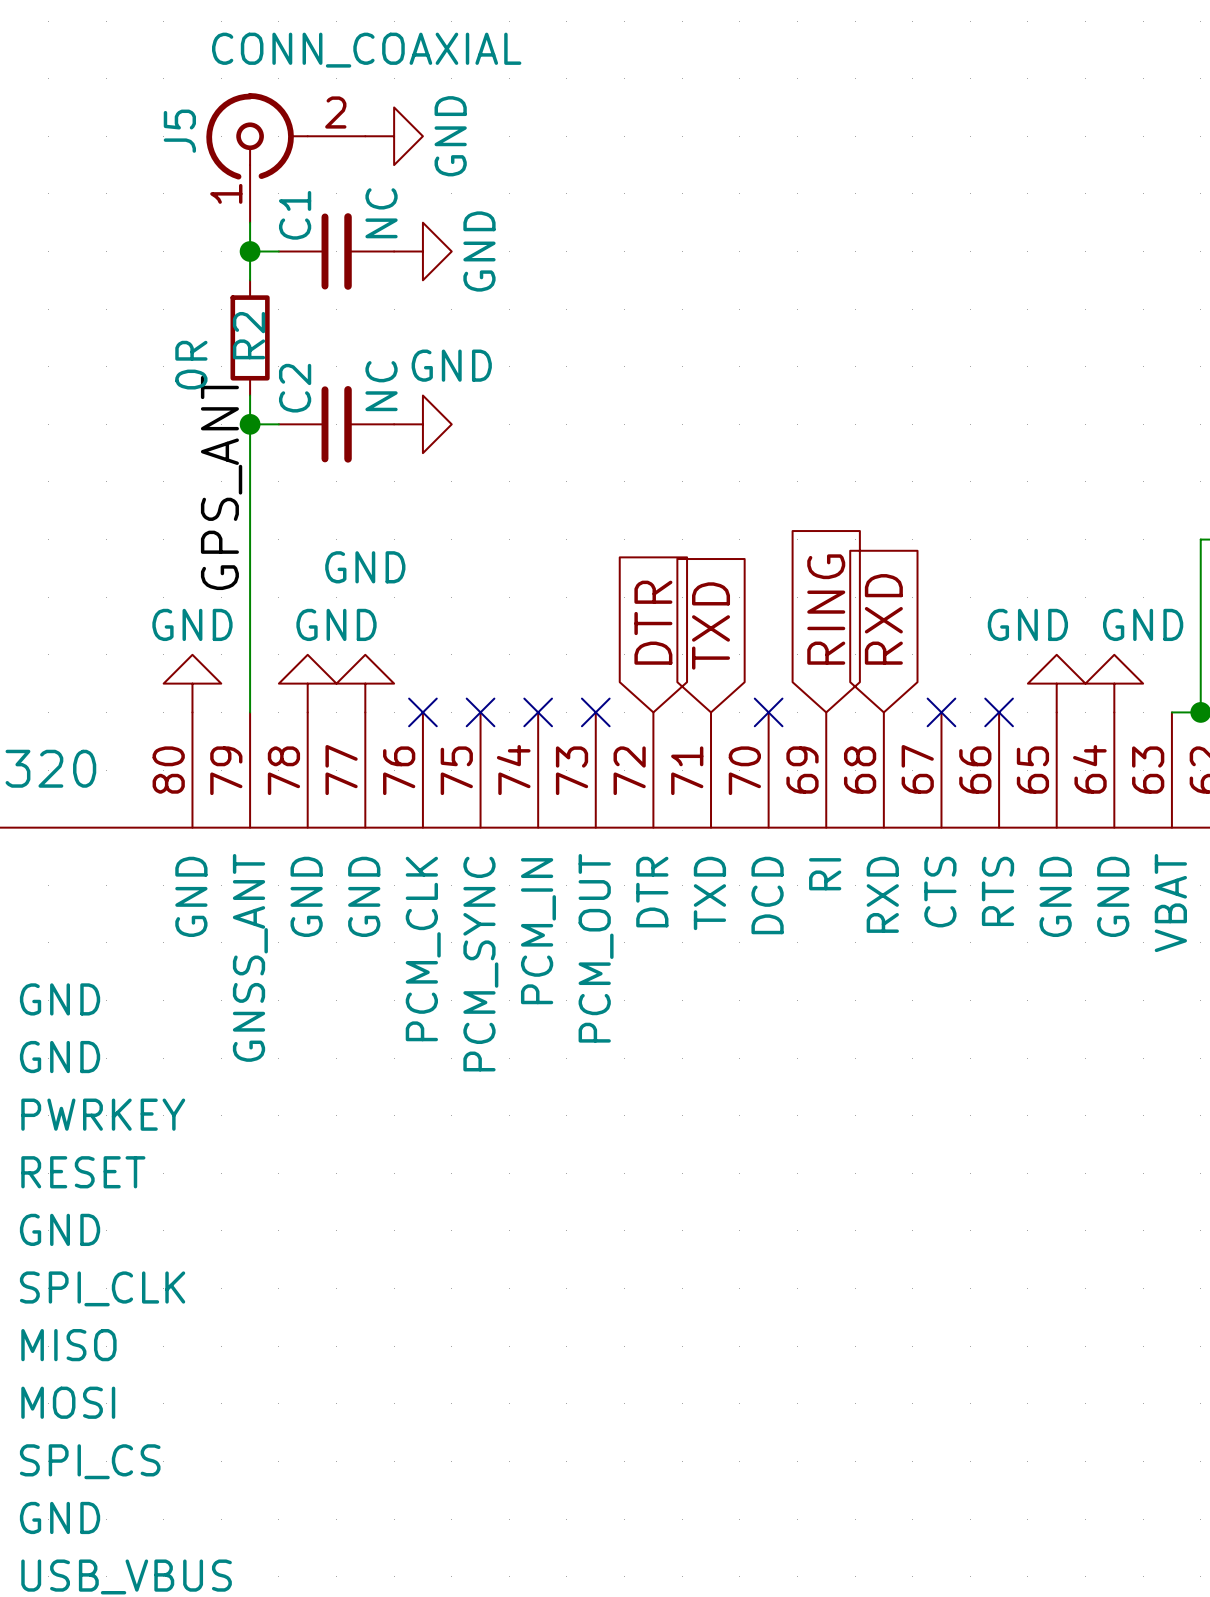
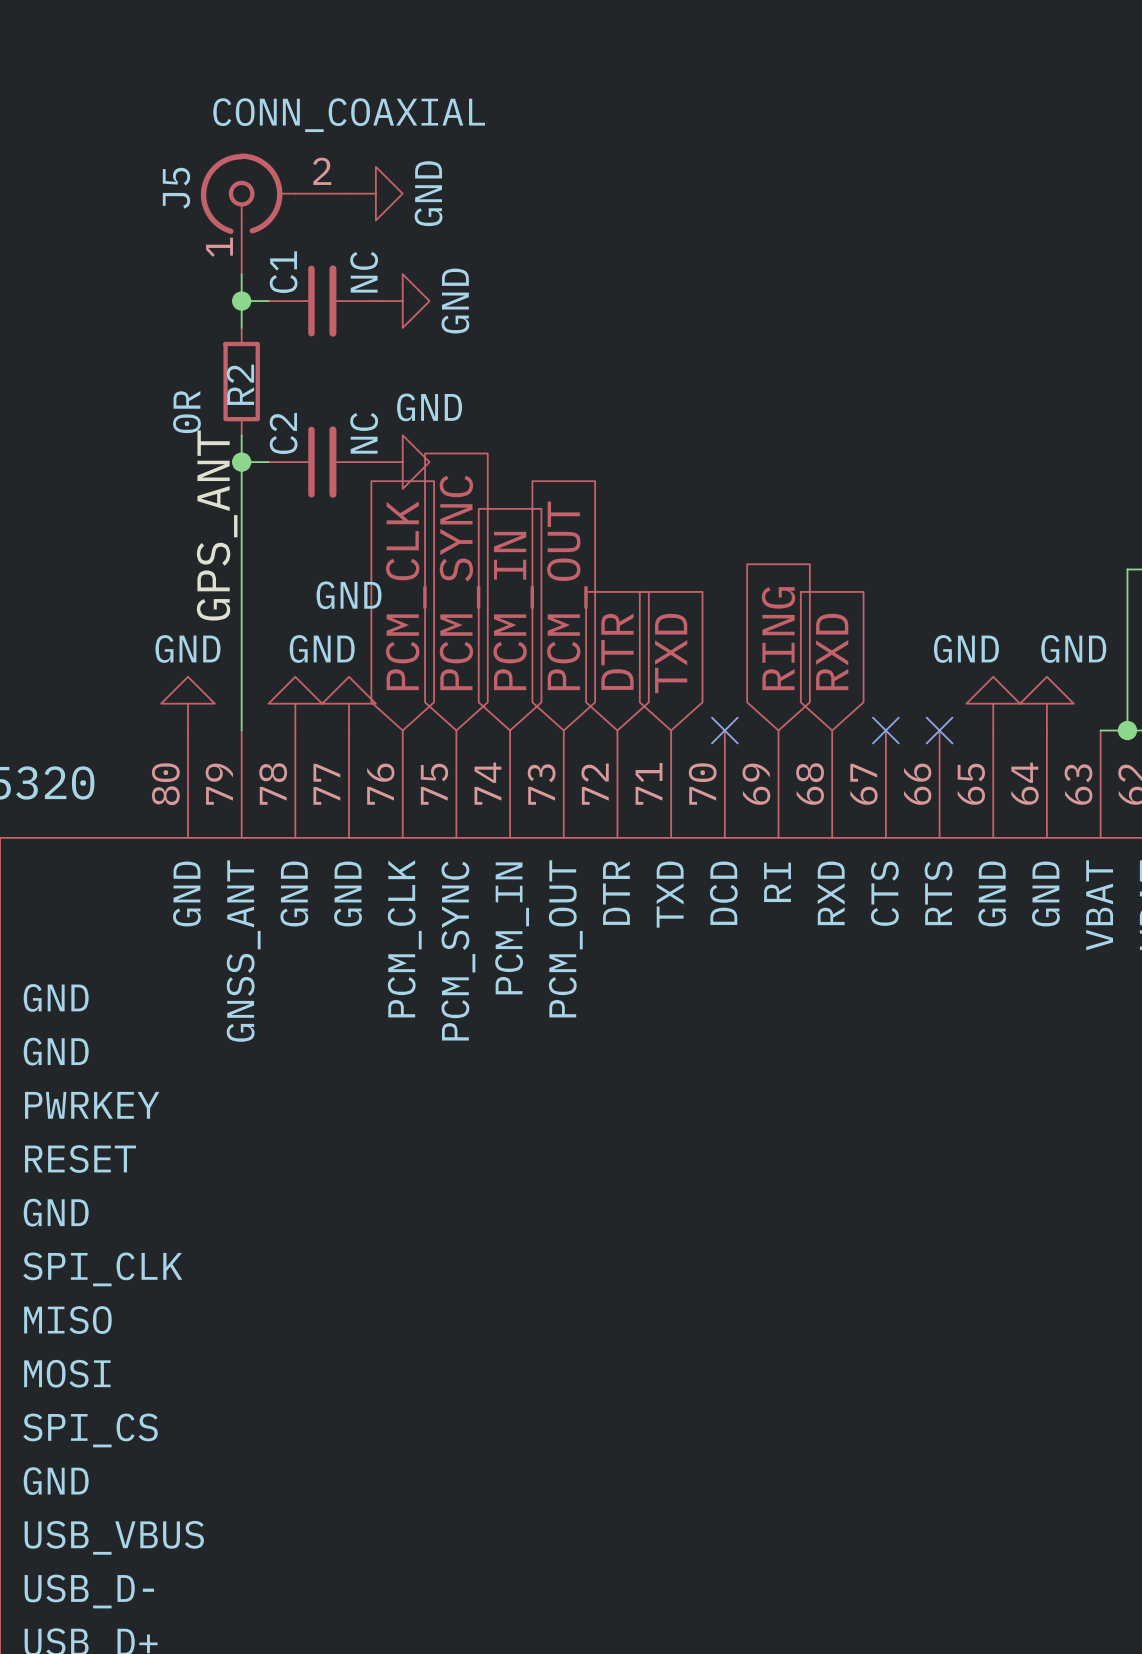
global label: none -> PCM_SYNC (460, 582)
global label: none -> PCM_OUT (567, 595)
global label: none -> PCM_CLK (406, 595)
global label: none -> PCM_IN (513, 610)
no-connect mark: (422, 712) -> none
no-connect mark: (480, 712) -> none
no-connect mark: (538, 712) -> none
no-connect mark: (595, 712) -> none

